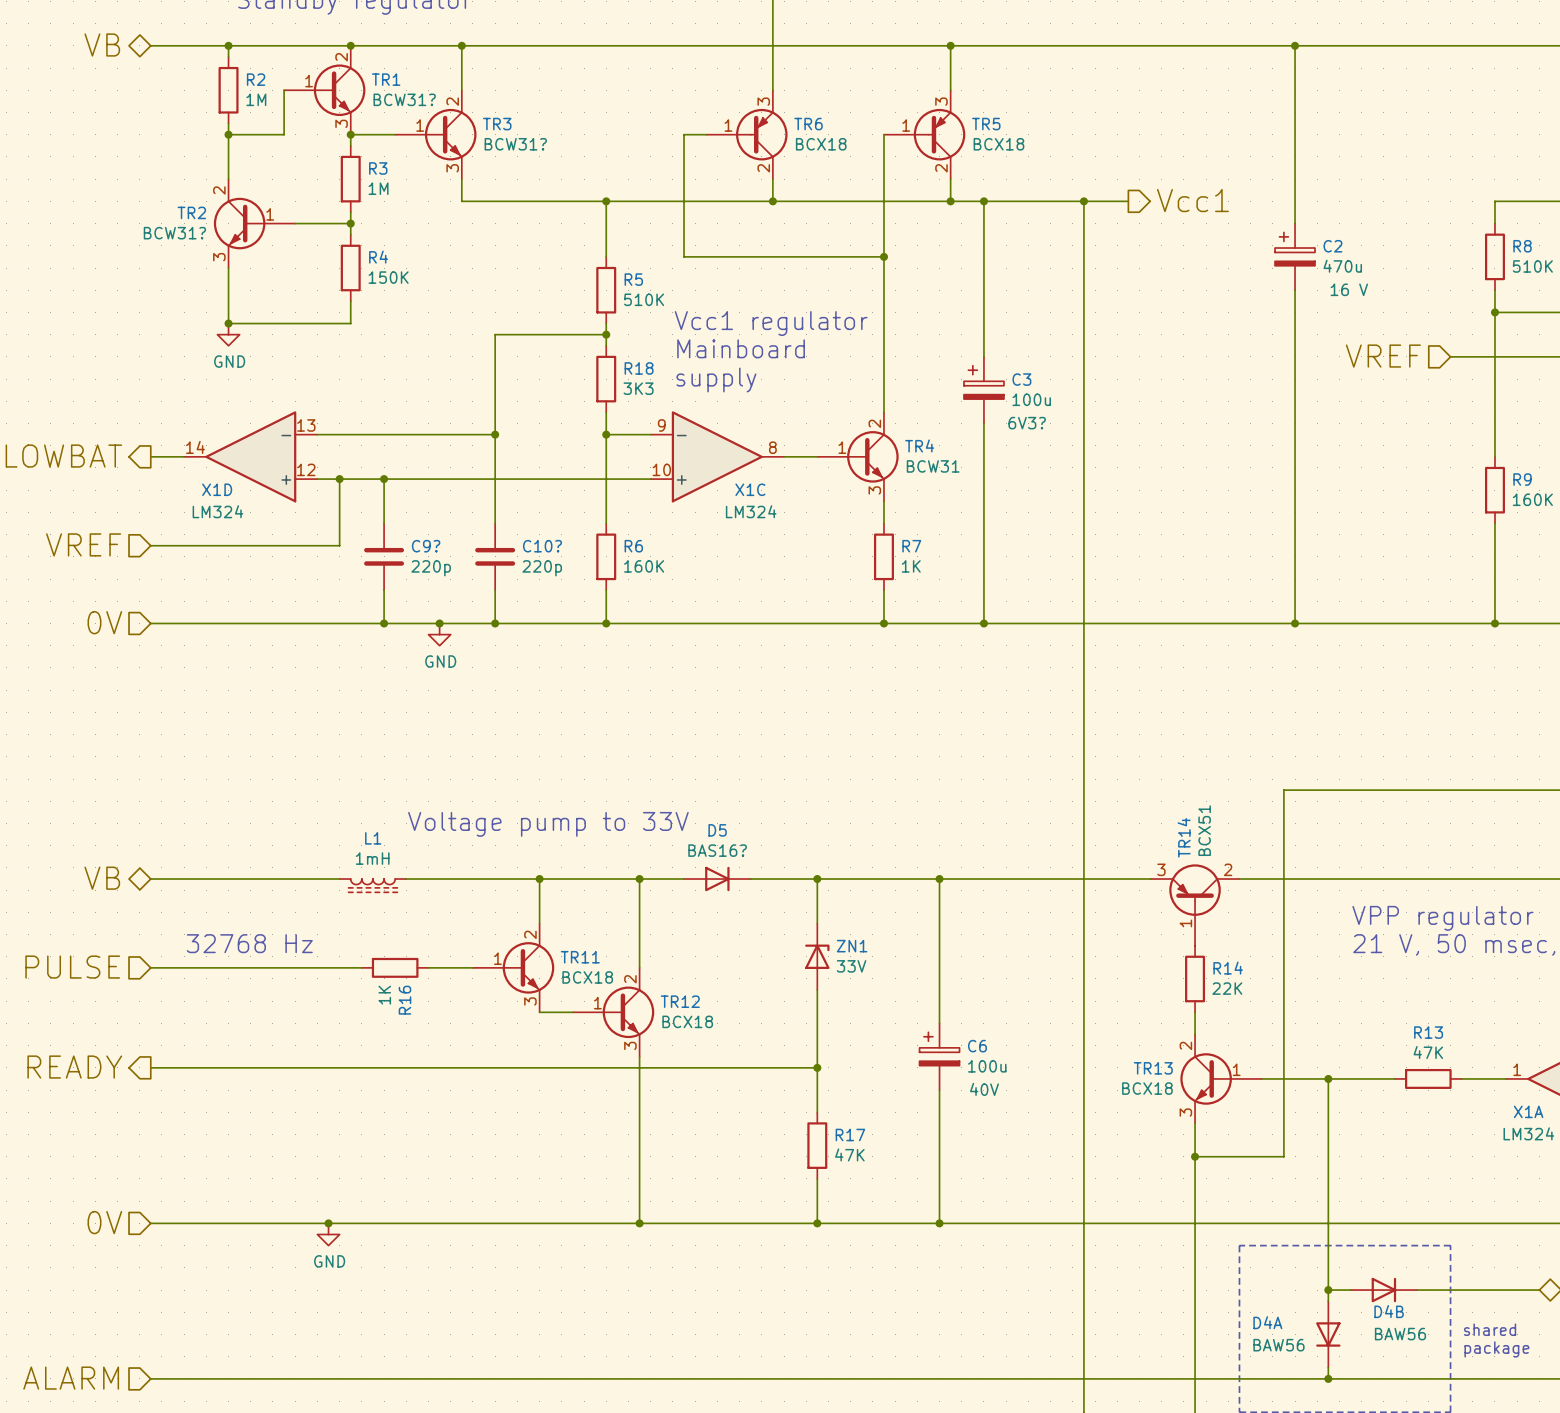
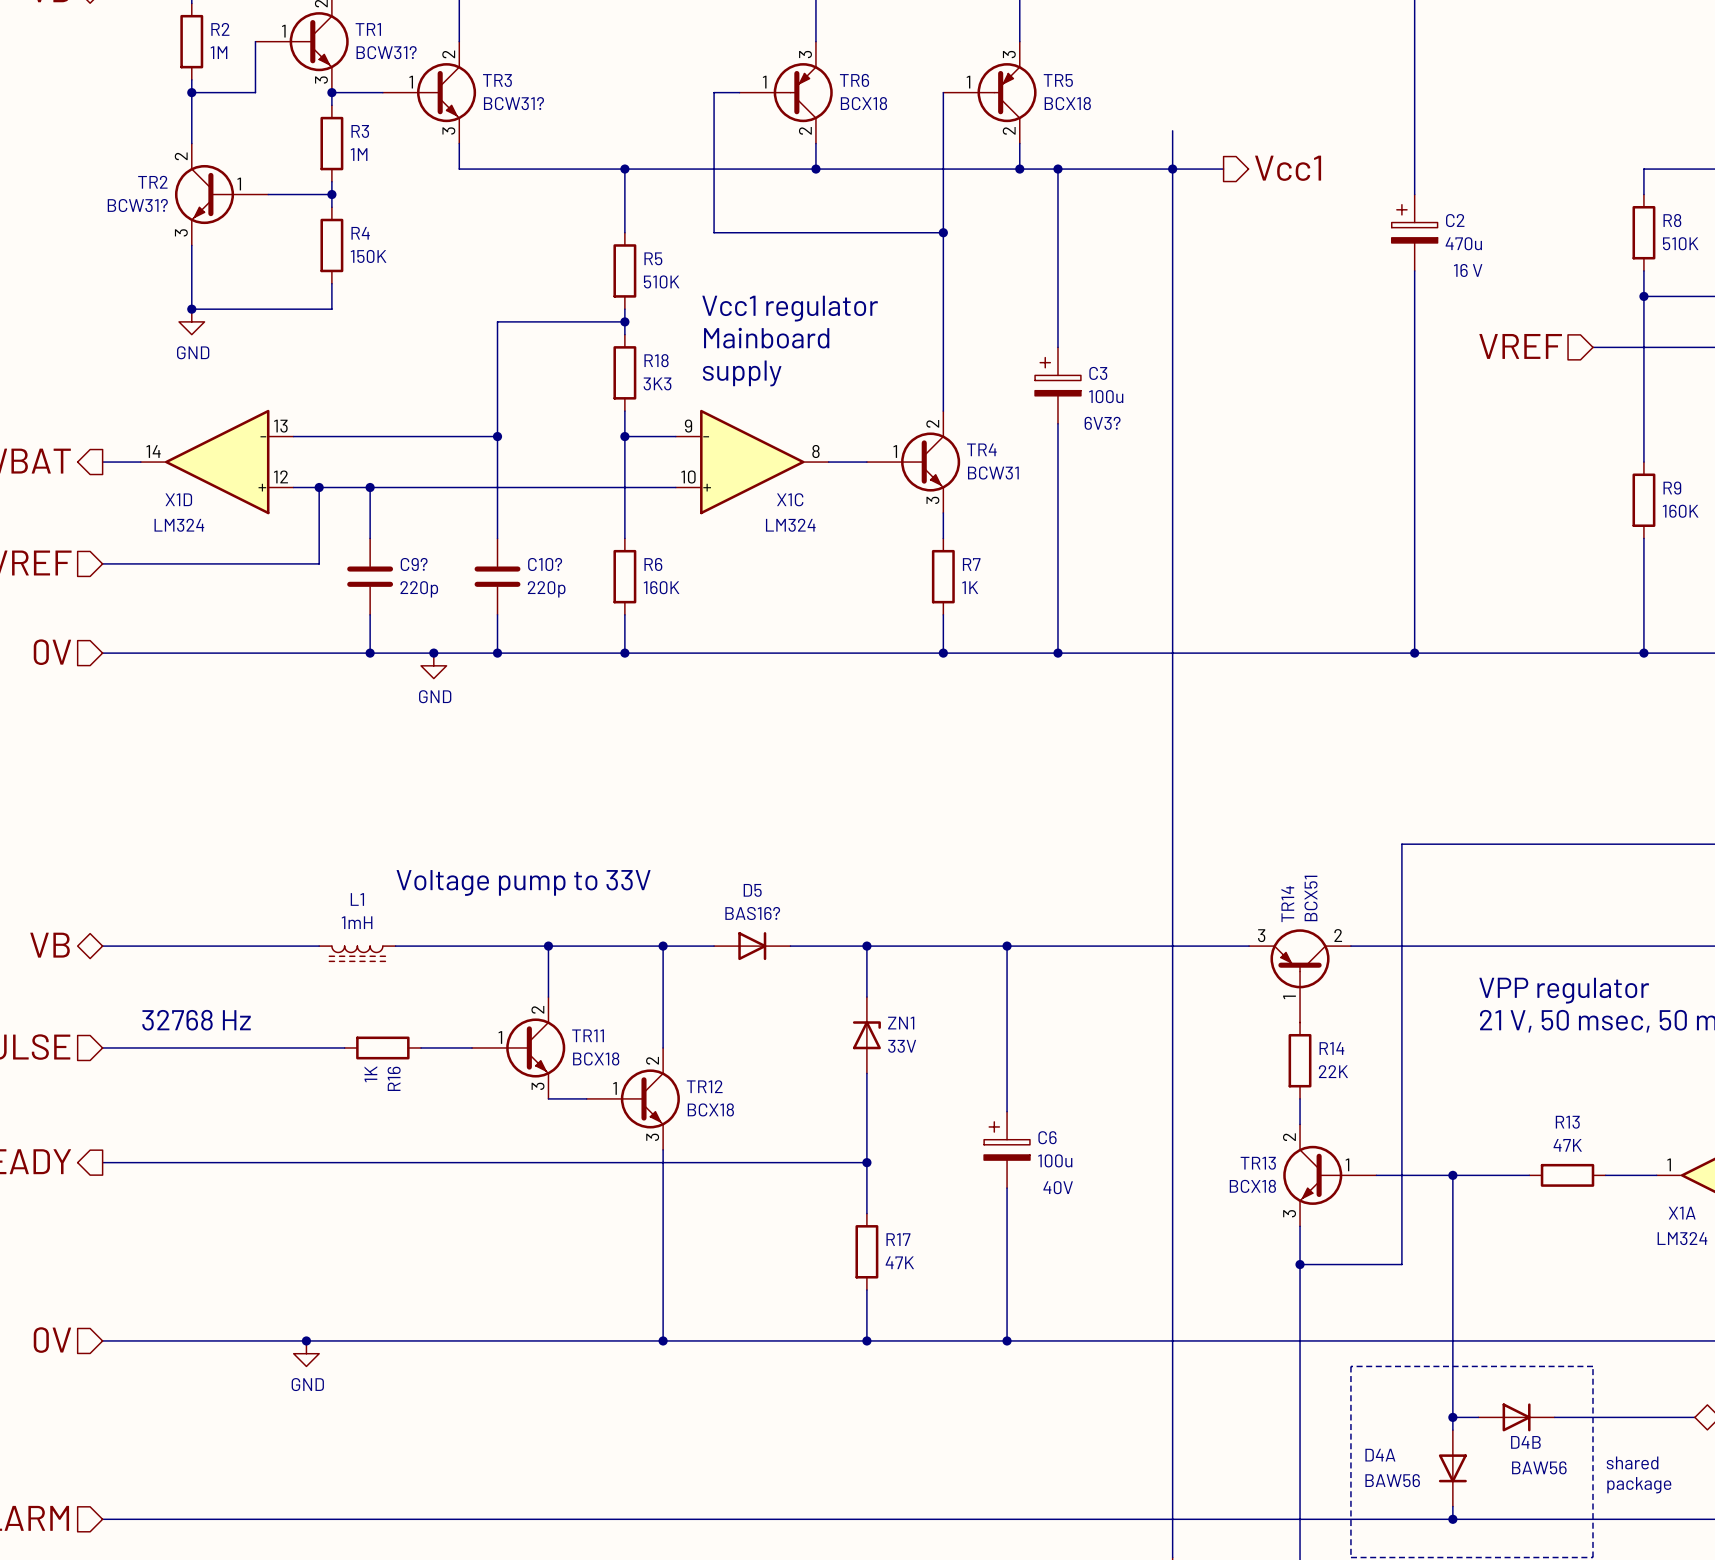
wire: none -> (1172, 130) (1172, 169)

